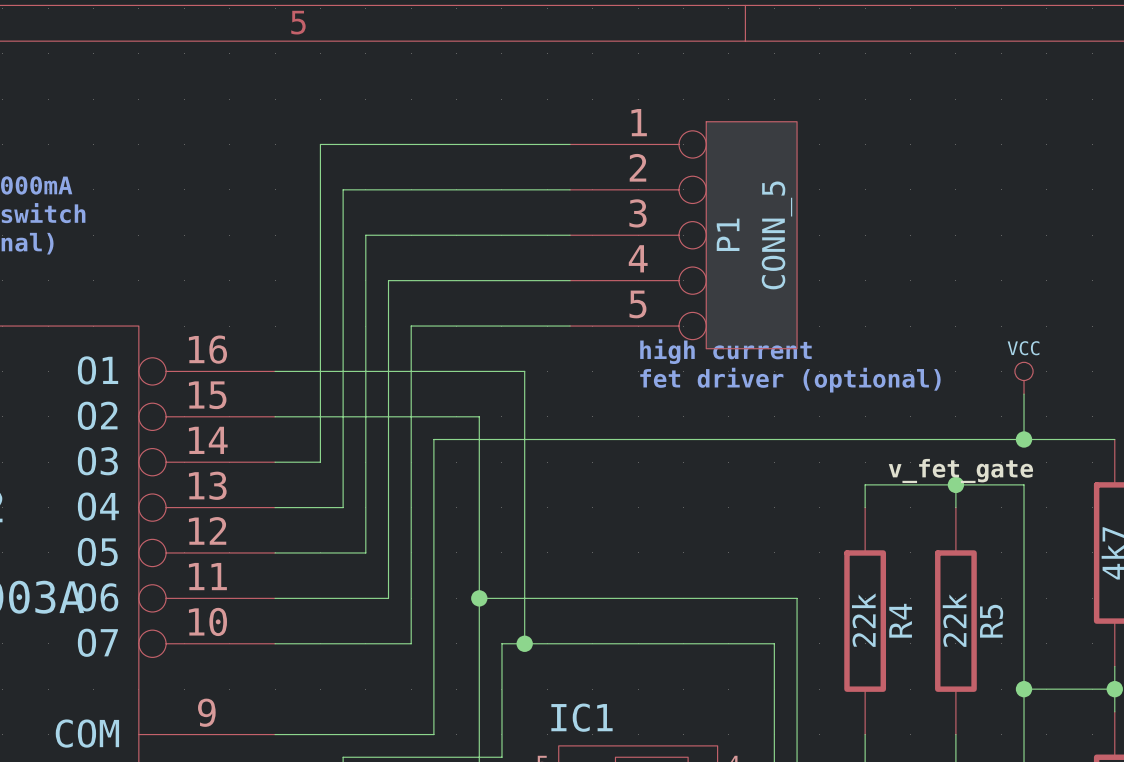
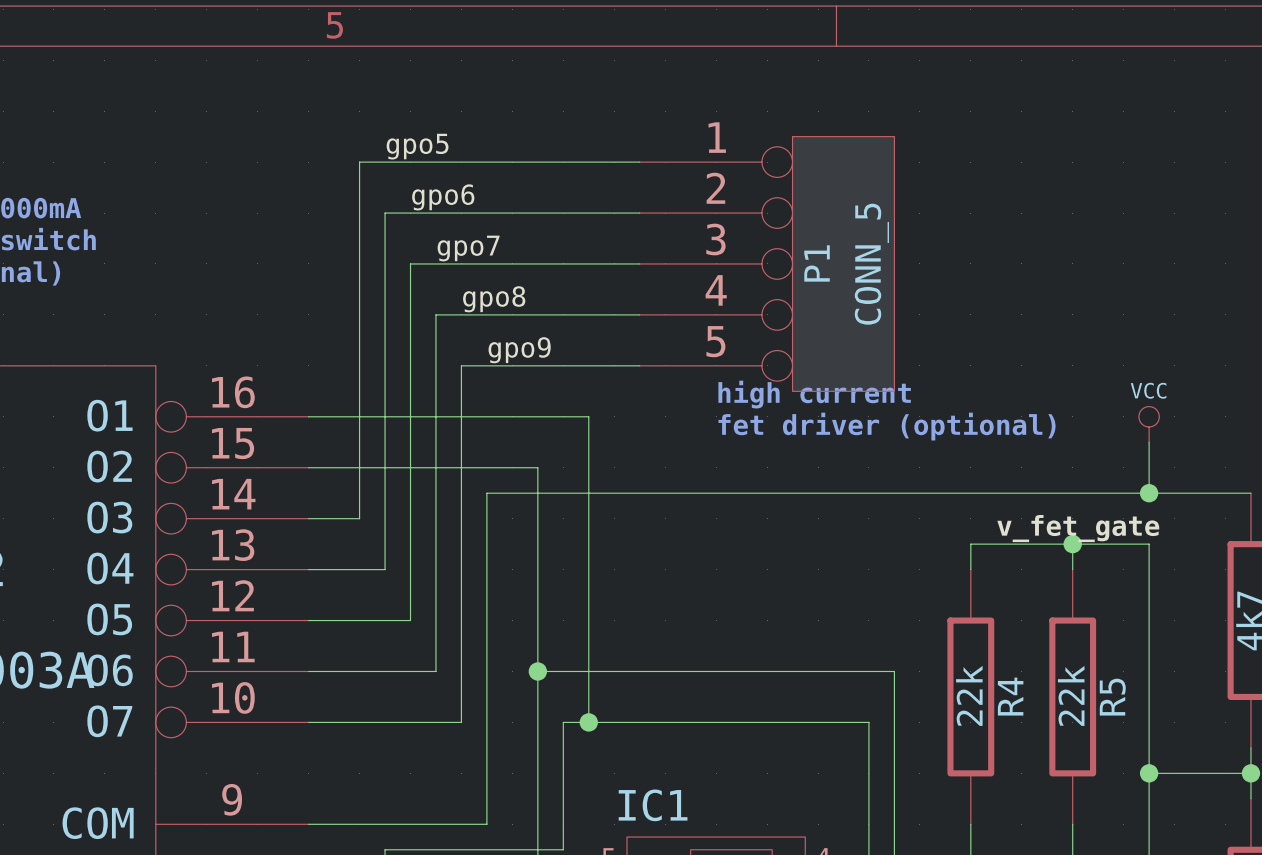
label: none -> gpo5 (417, 146)
label: none -> gpo6 (443, 197)
label: none -> gpo7 (468, 248)
label: none -> gpo8 (494, 299)
label: none -> gpo9 (519, 350)

